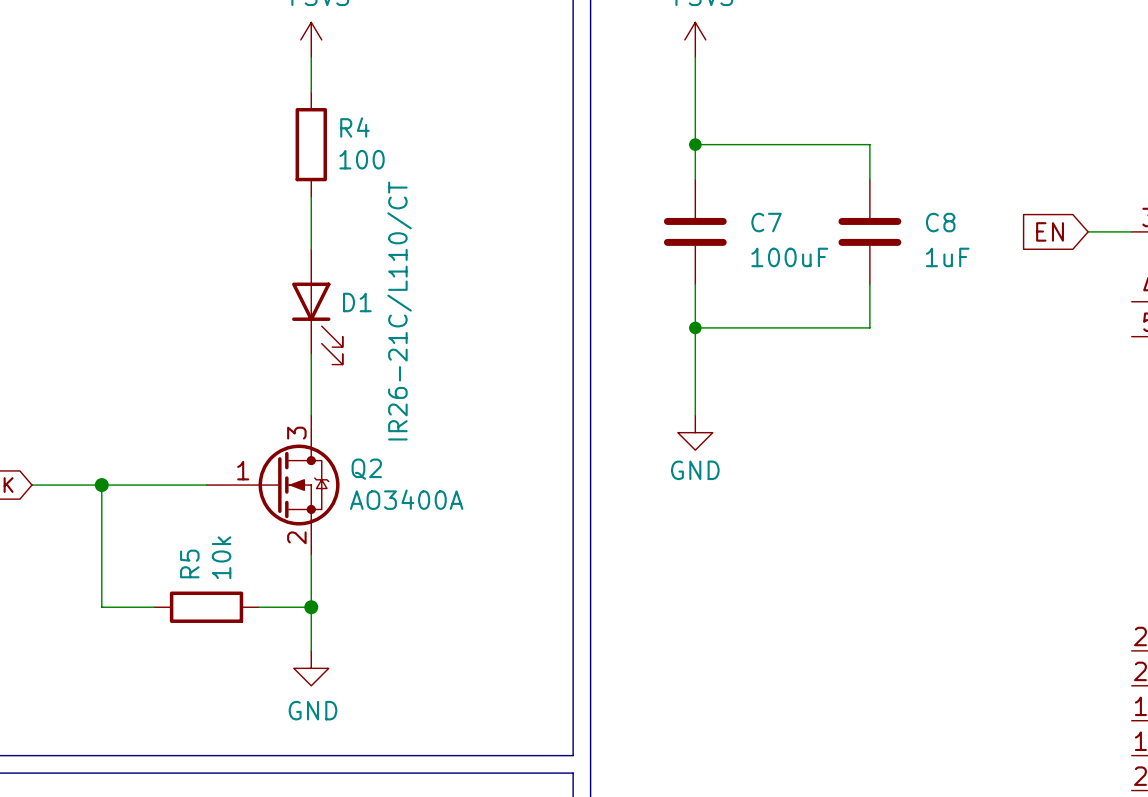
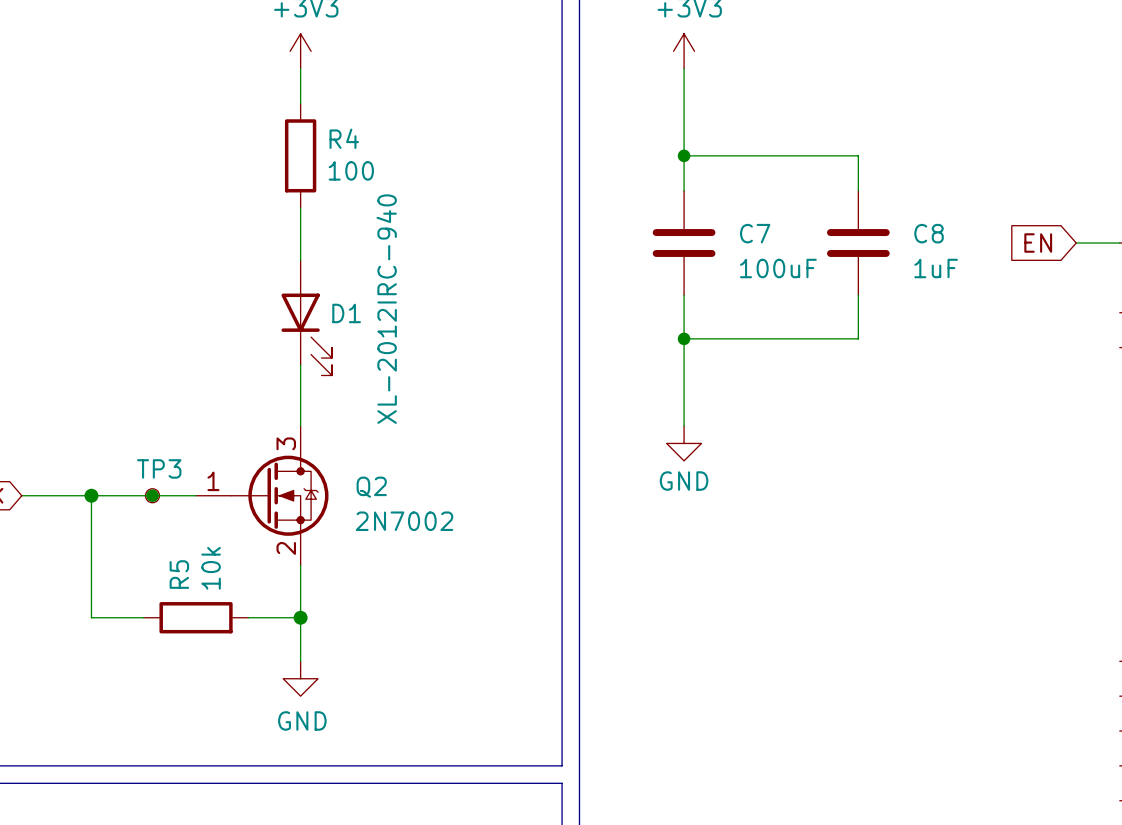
D1 value: IR26-21C/L110/CT (399, 311) -> XL-2012IRC-940 (386, 309)
Q2 symbol: [206, 415, 340, 555] -> [196, 426, 329, 566]
TP3: none -> (152, 495)
junction: none -> (152, 495)
Q2 value: AO3400A (406, 499) -> 2N7002 (404, 521)

